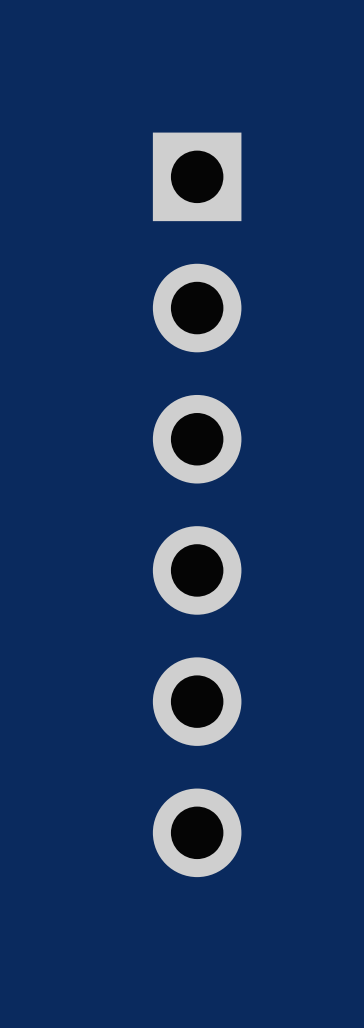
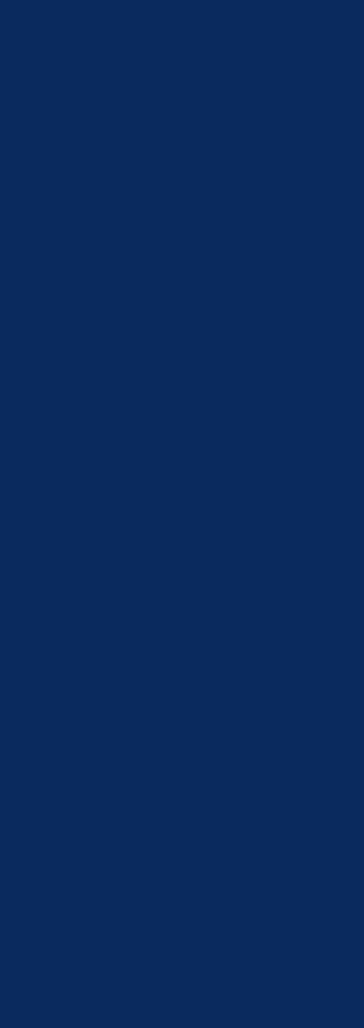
part: (197, 504) -> none

